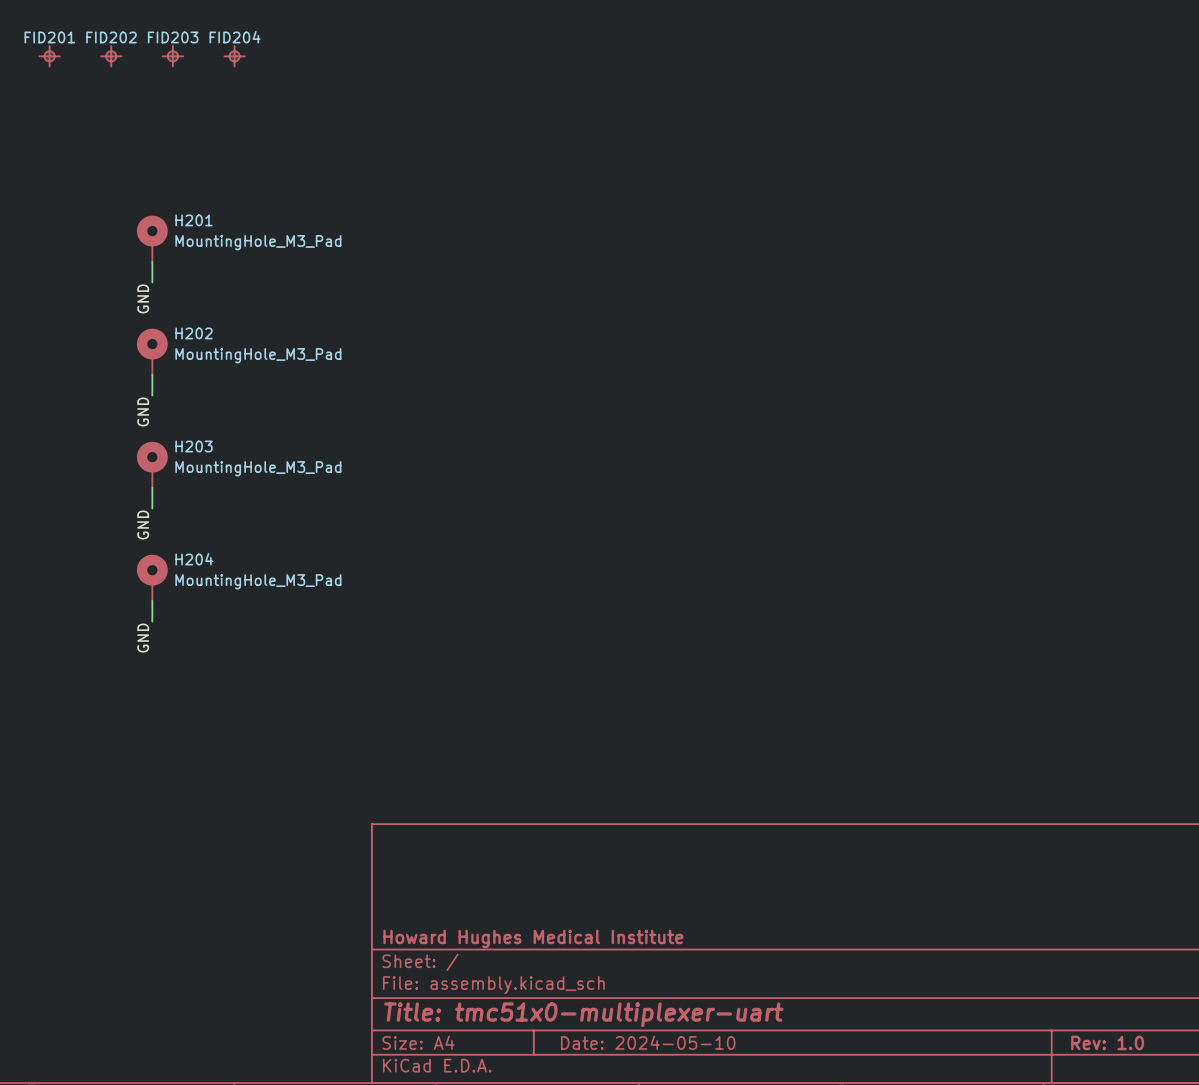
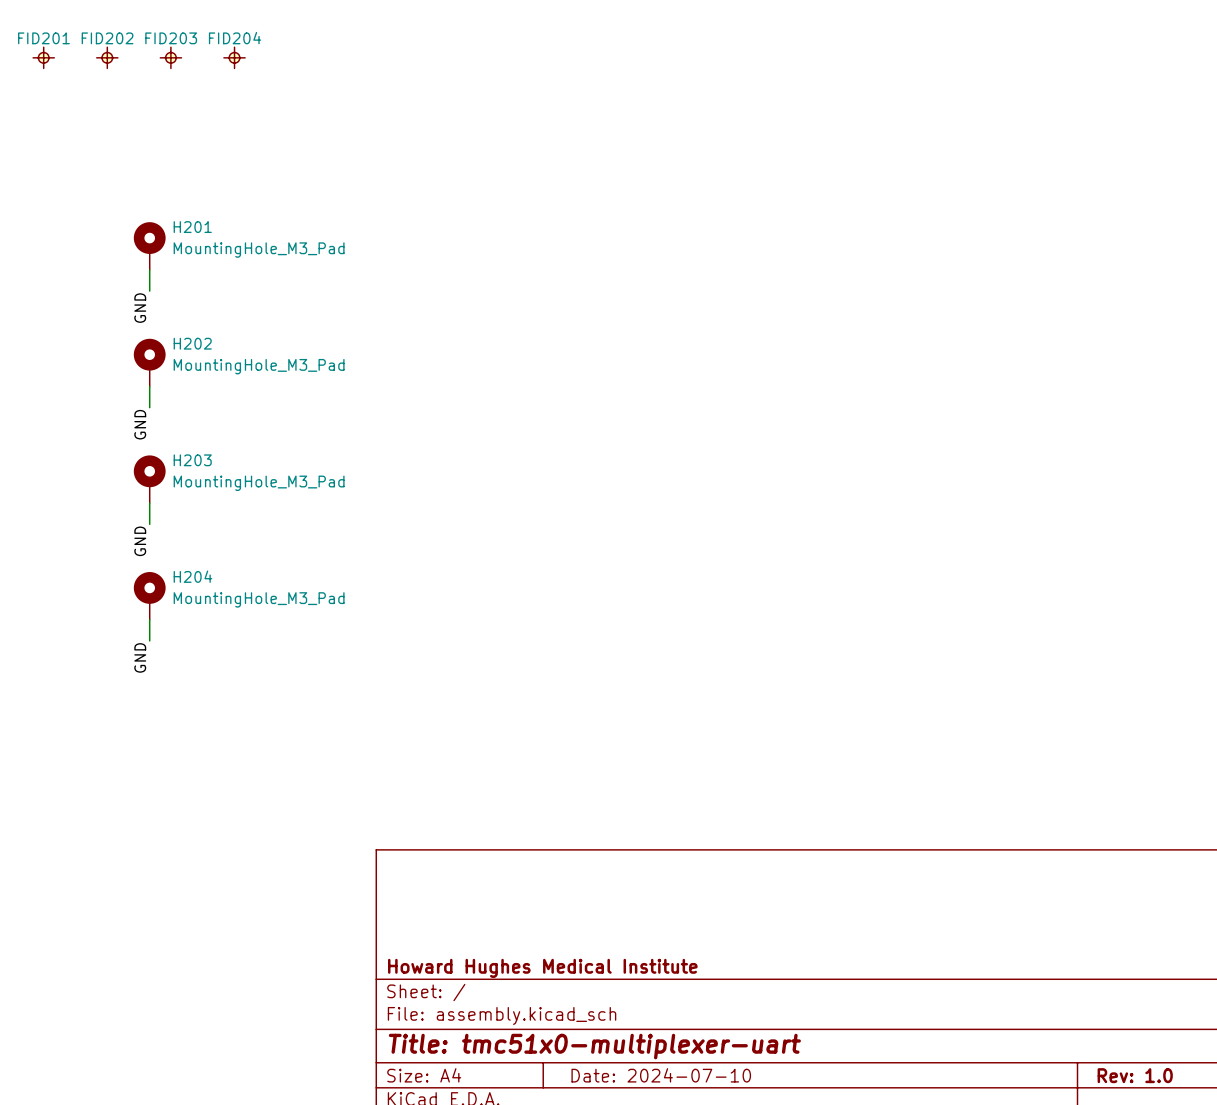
title block: Date: 2024-05-10 (648, 1042) -> Date: 2024-07-10 (661, 1075)

